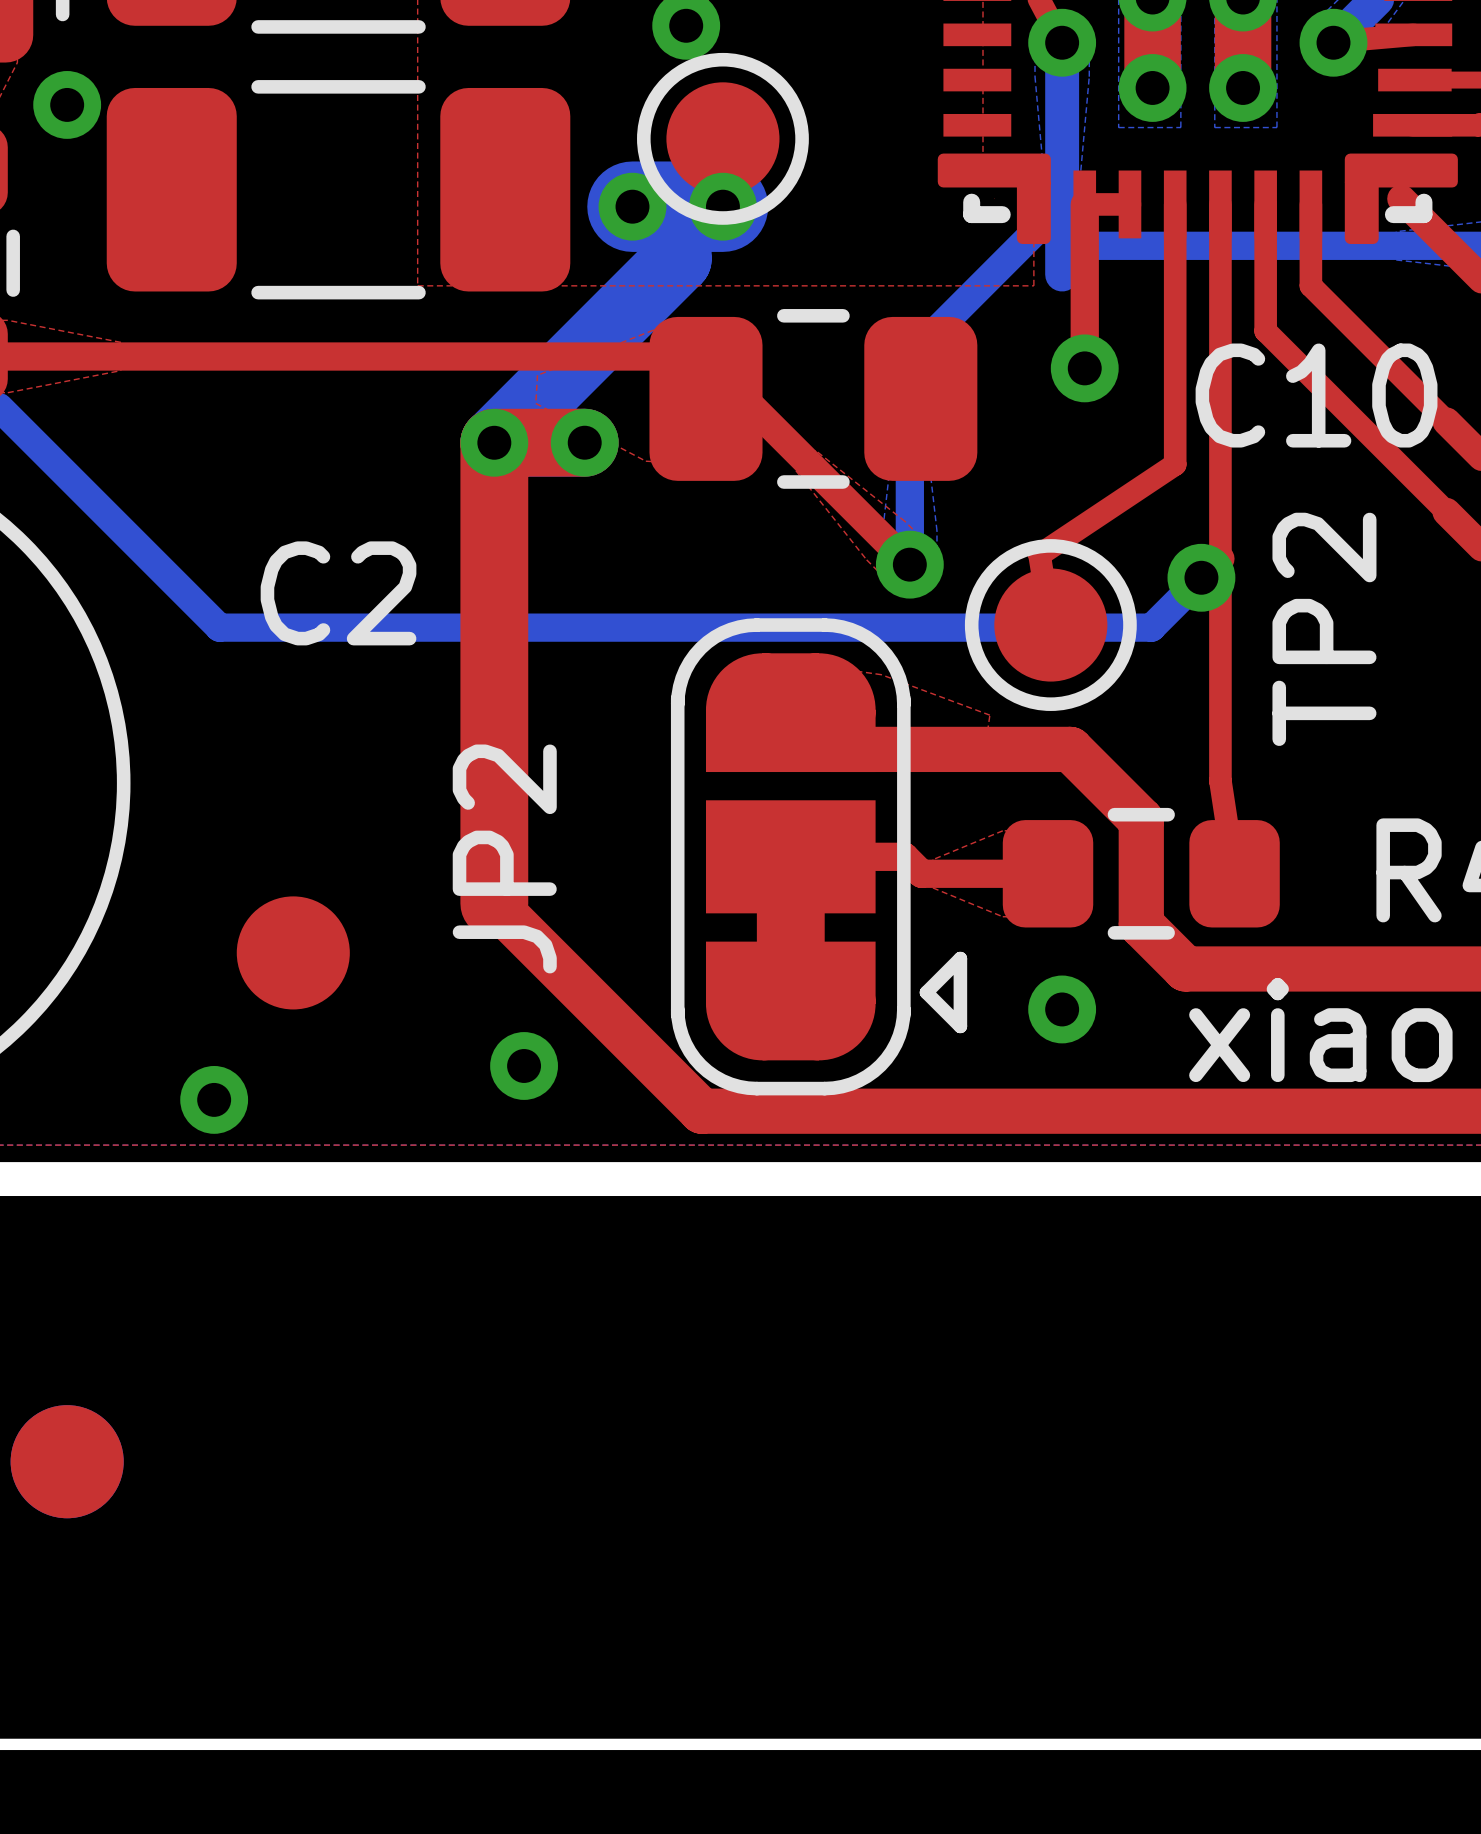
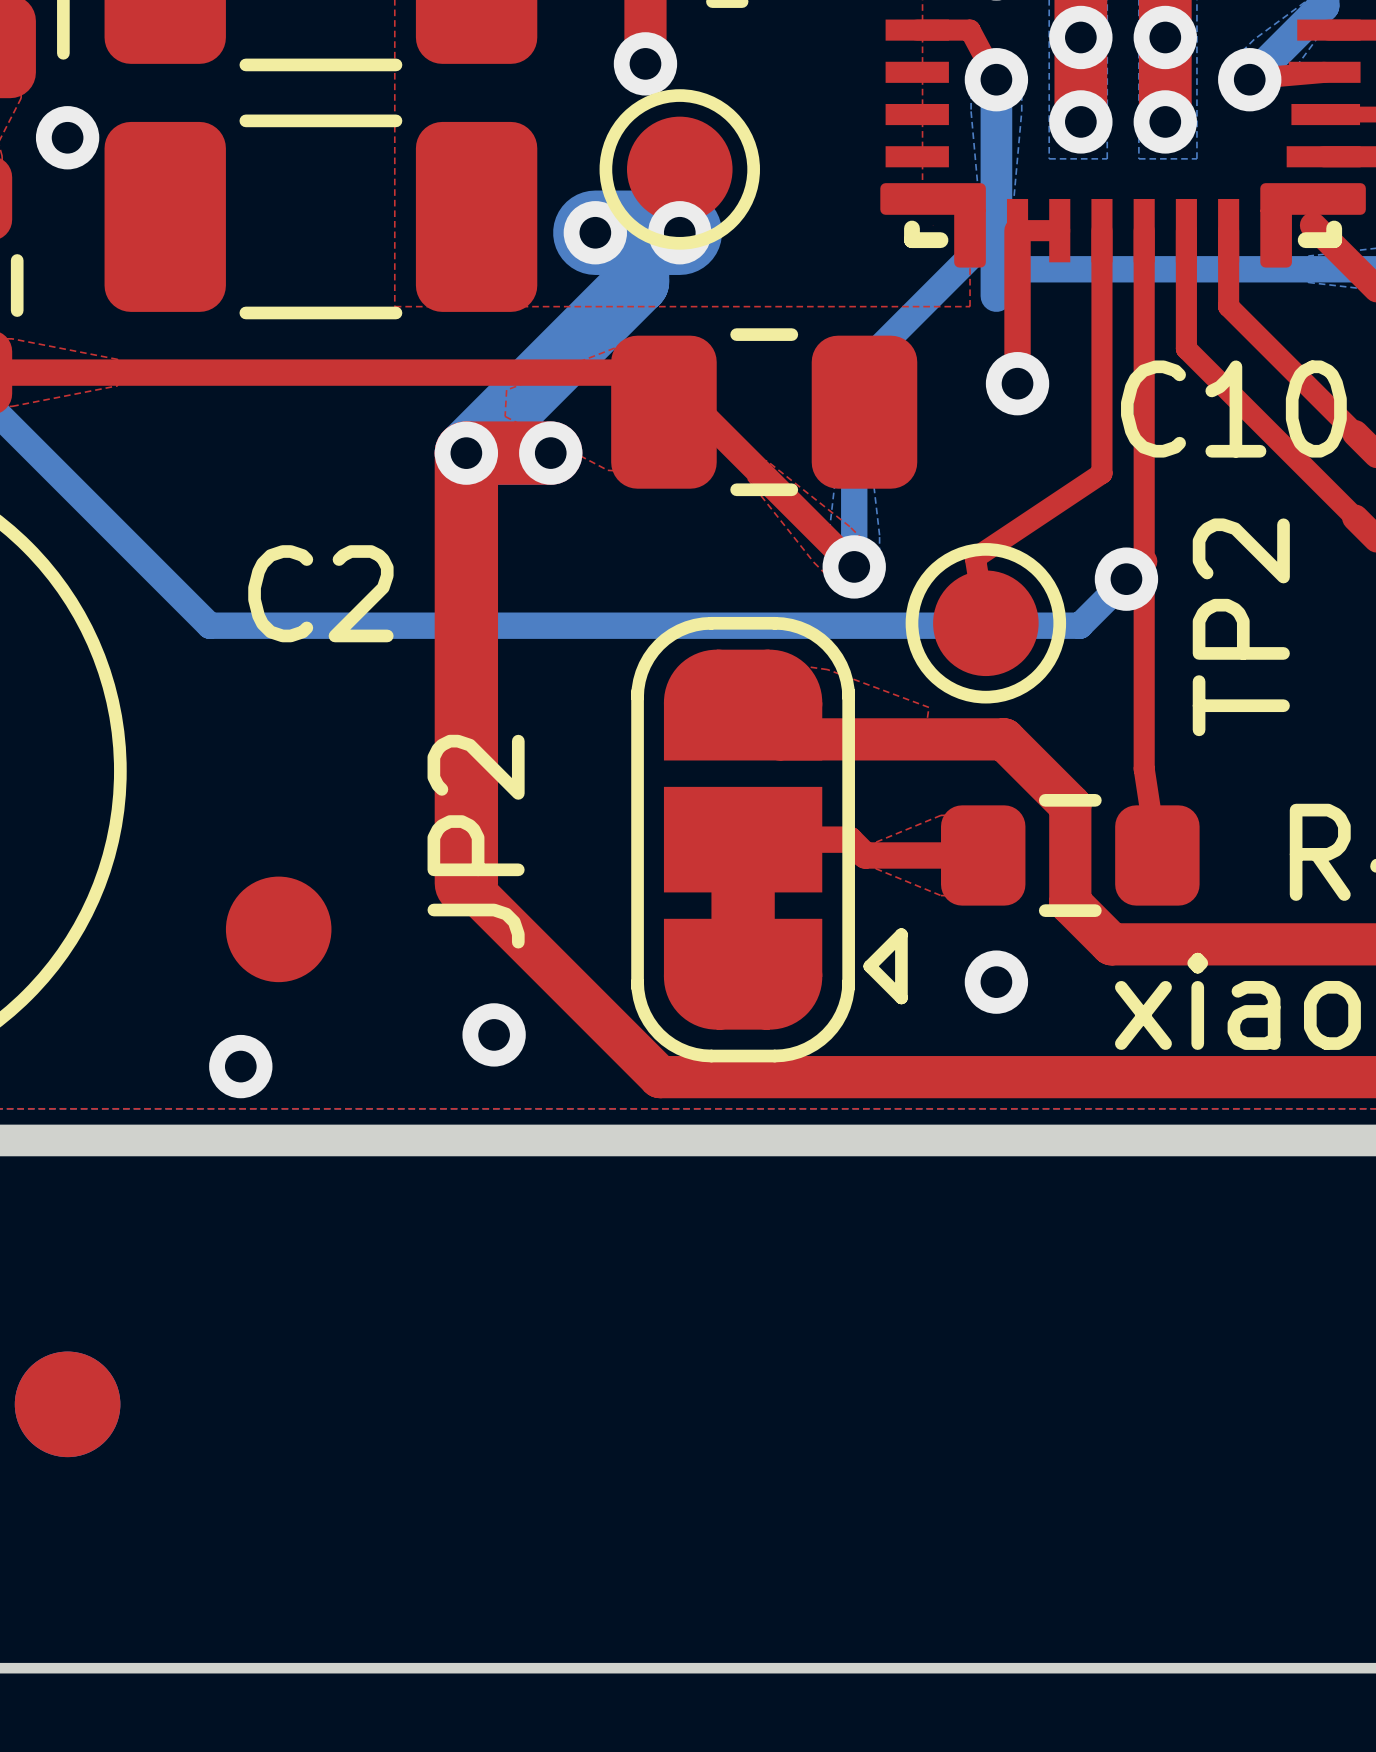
via position: (214, 1099) -> (240, 1066)

